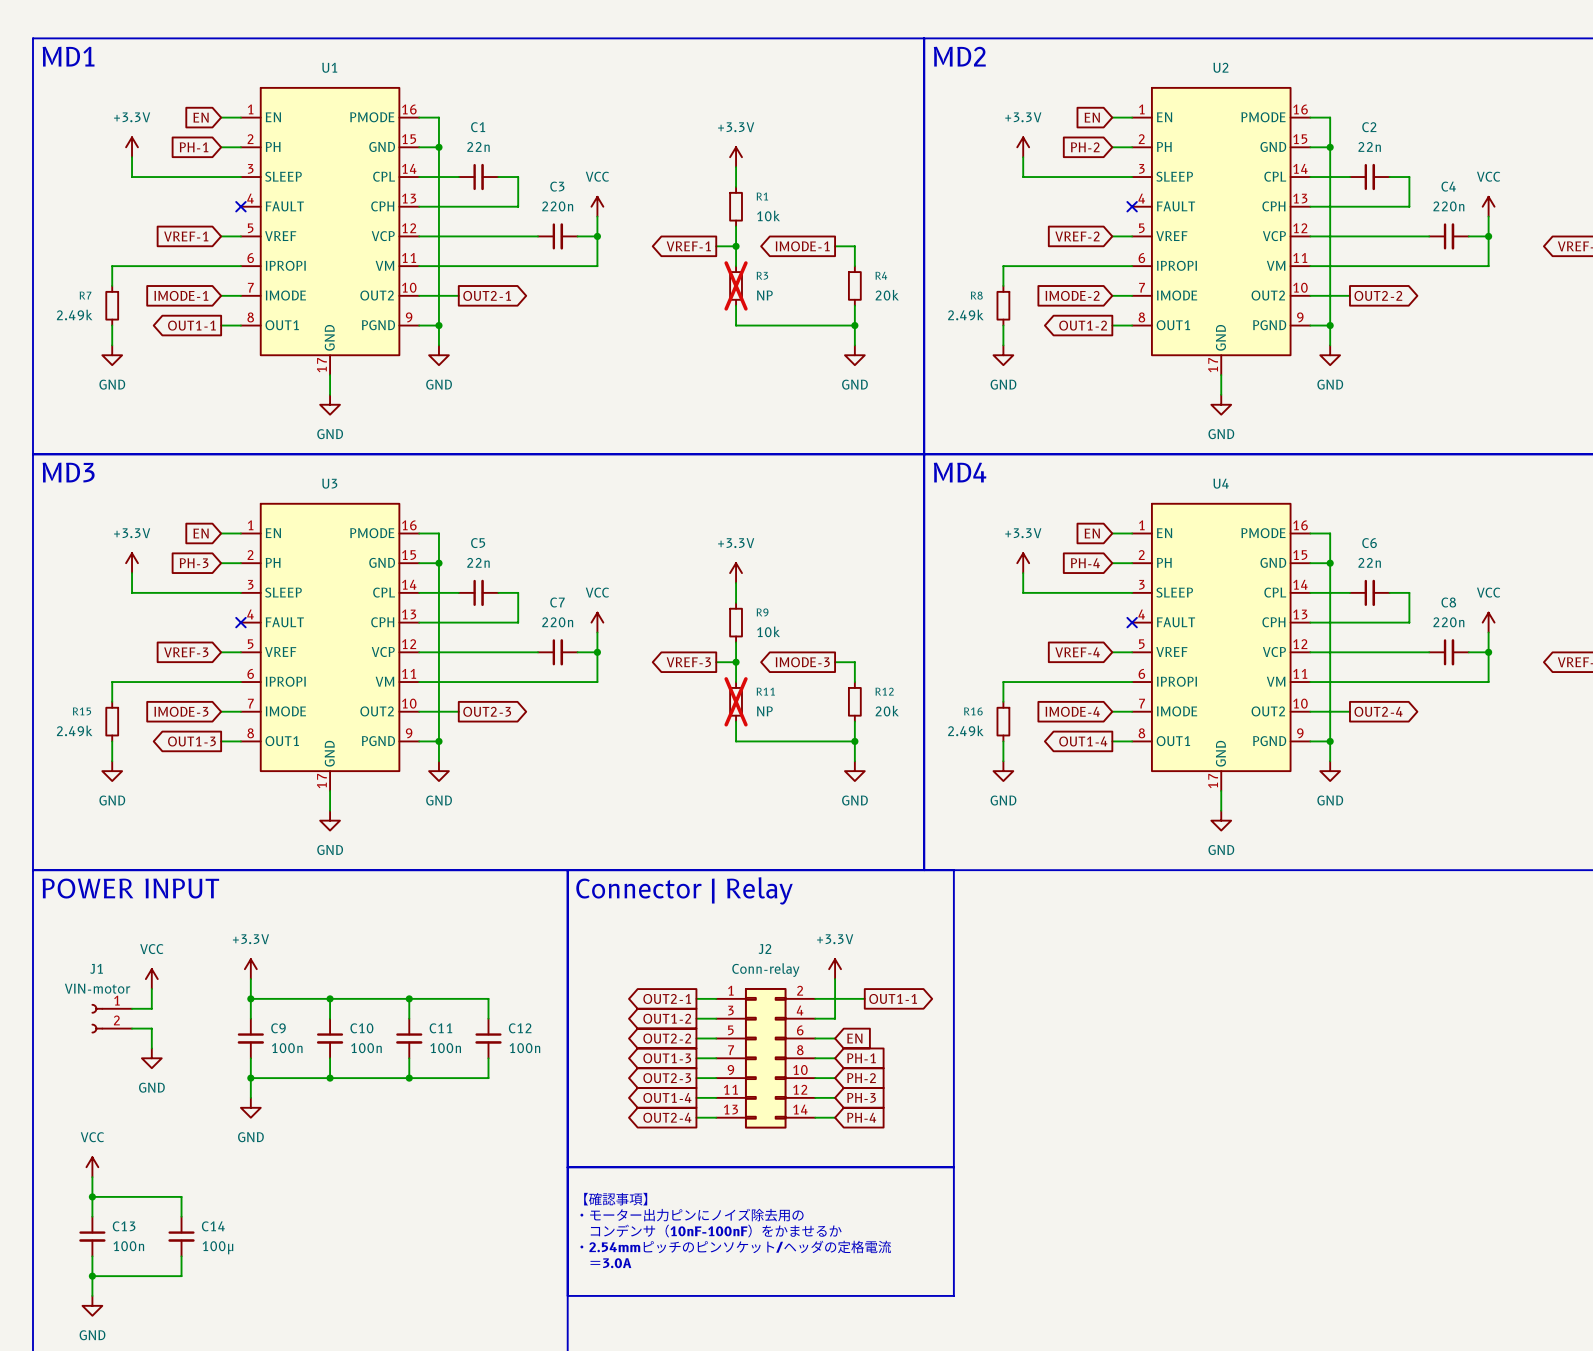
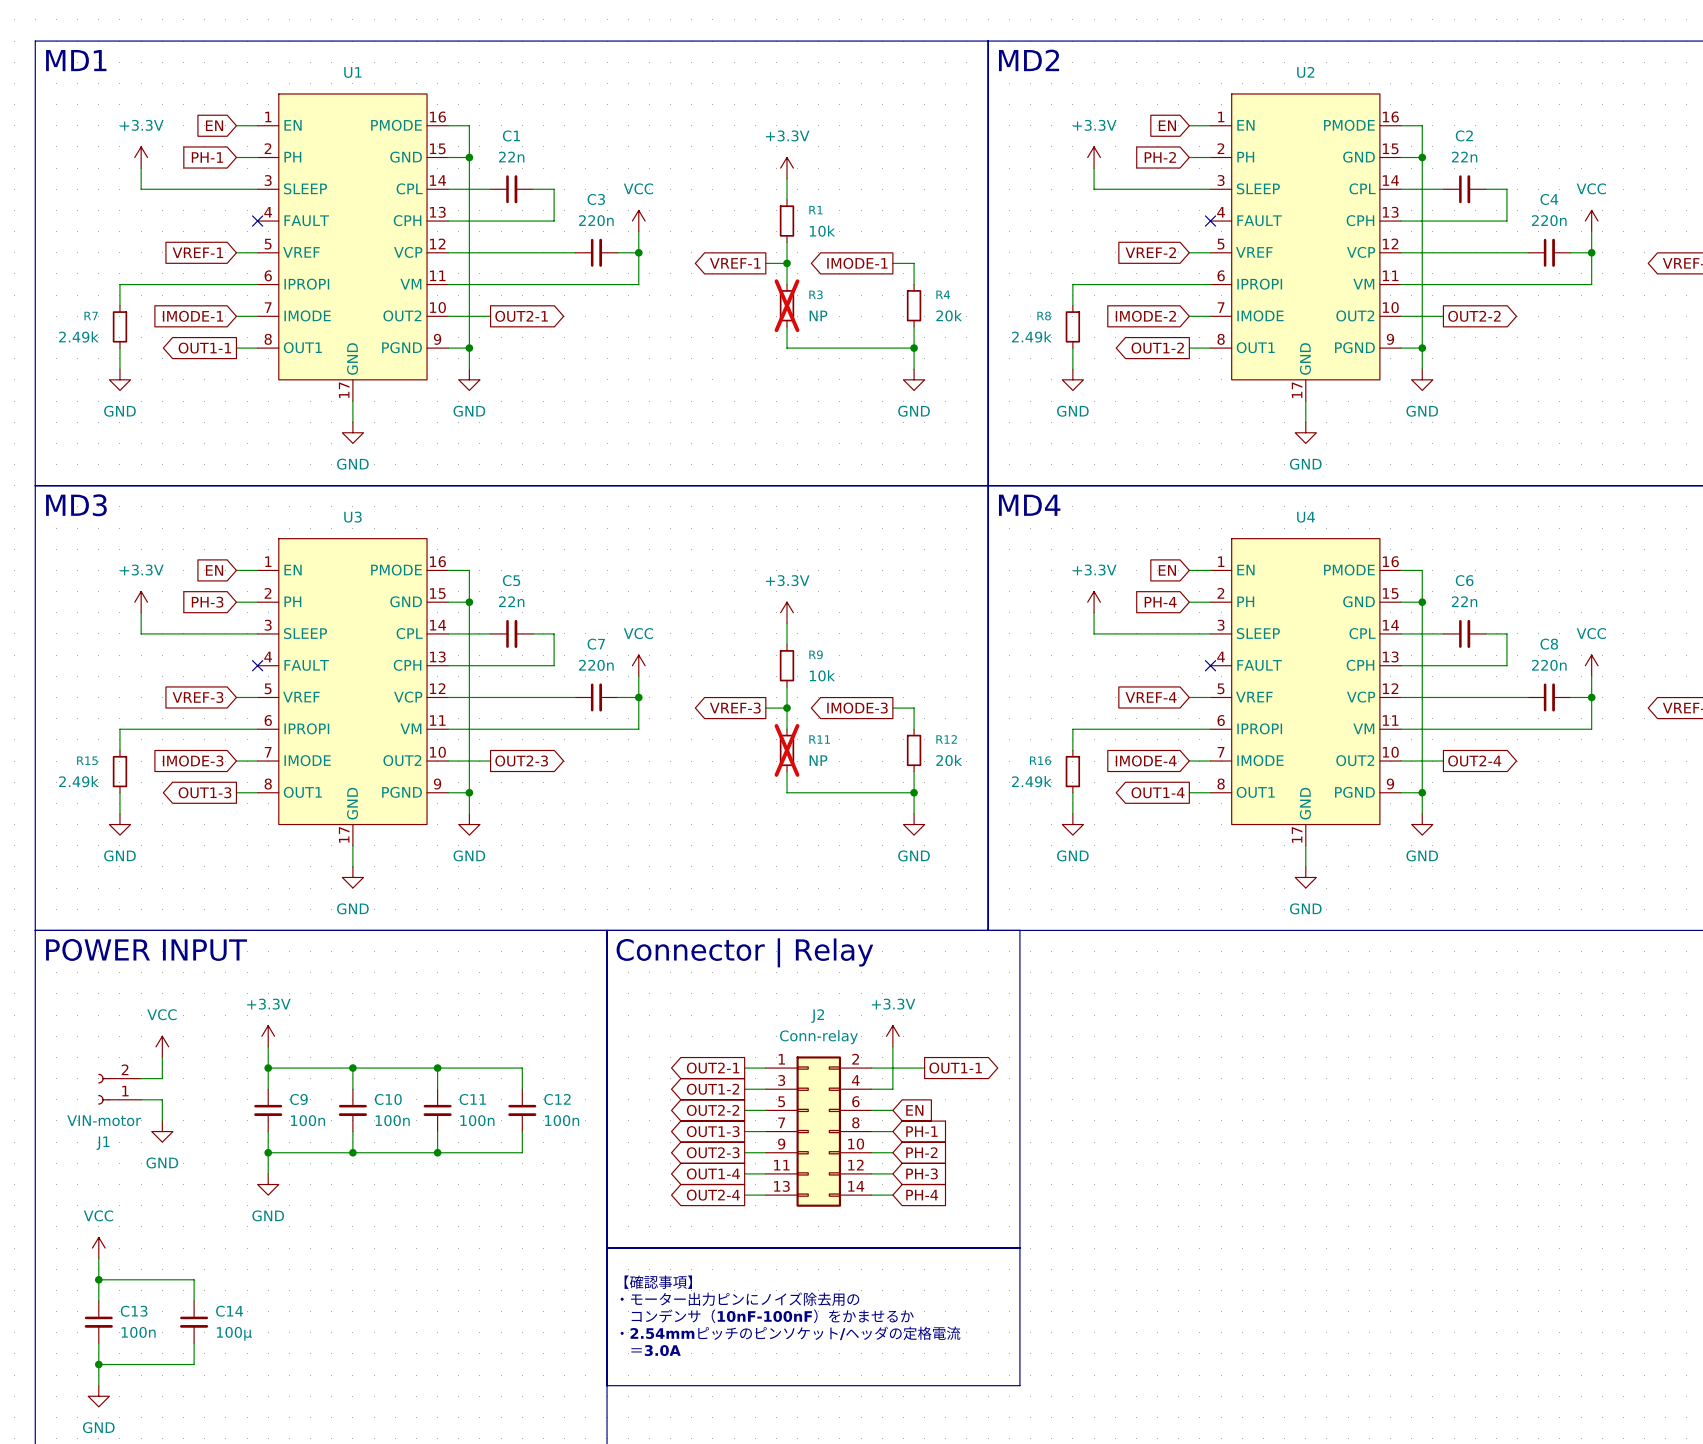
J1 flip: as is (97, 1018) -> up-down (104, 1089)

